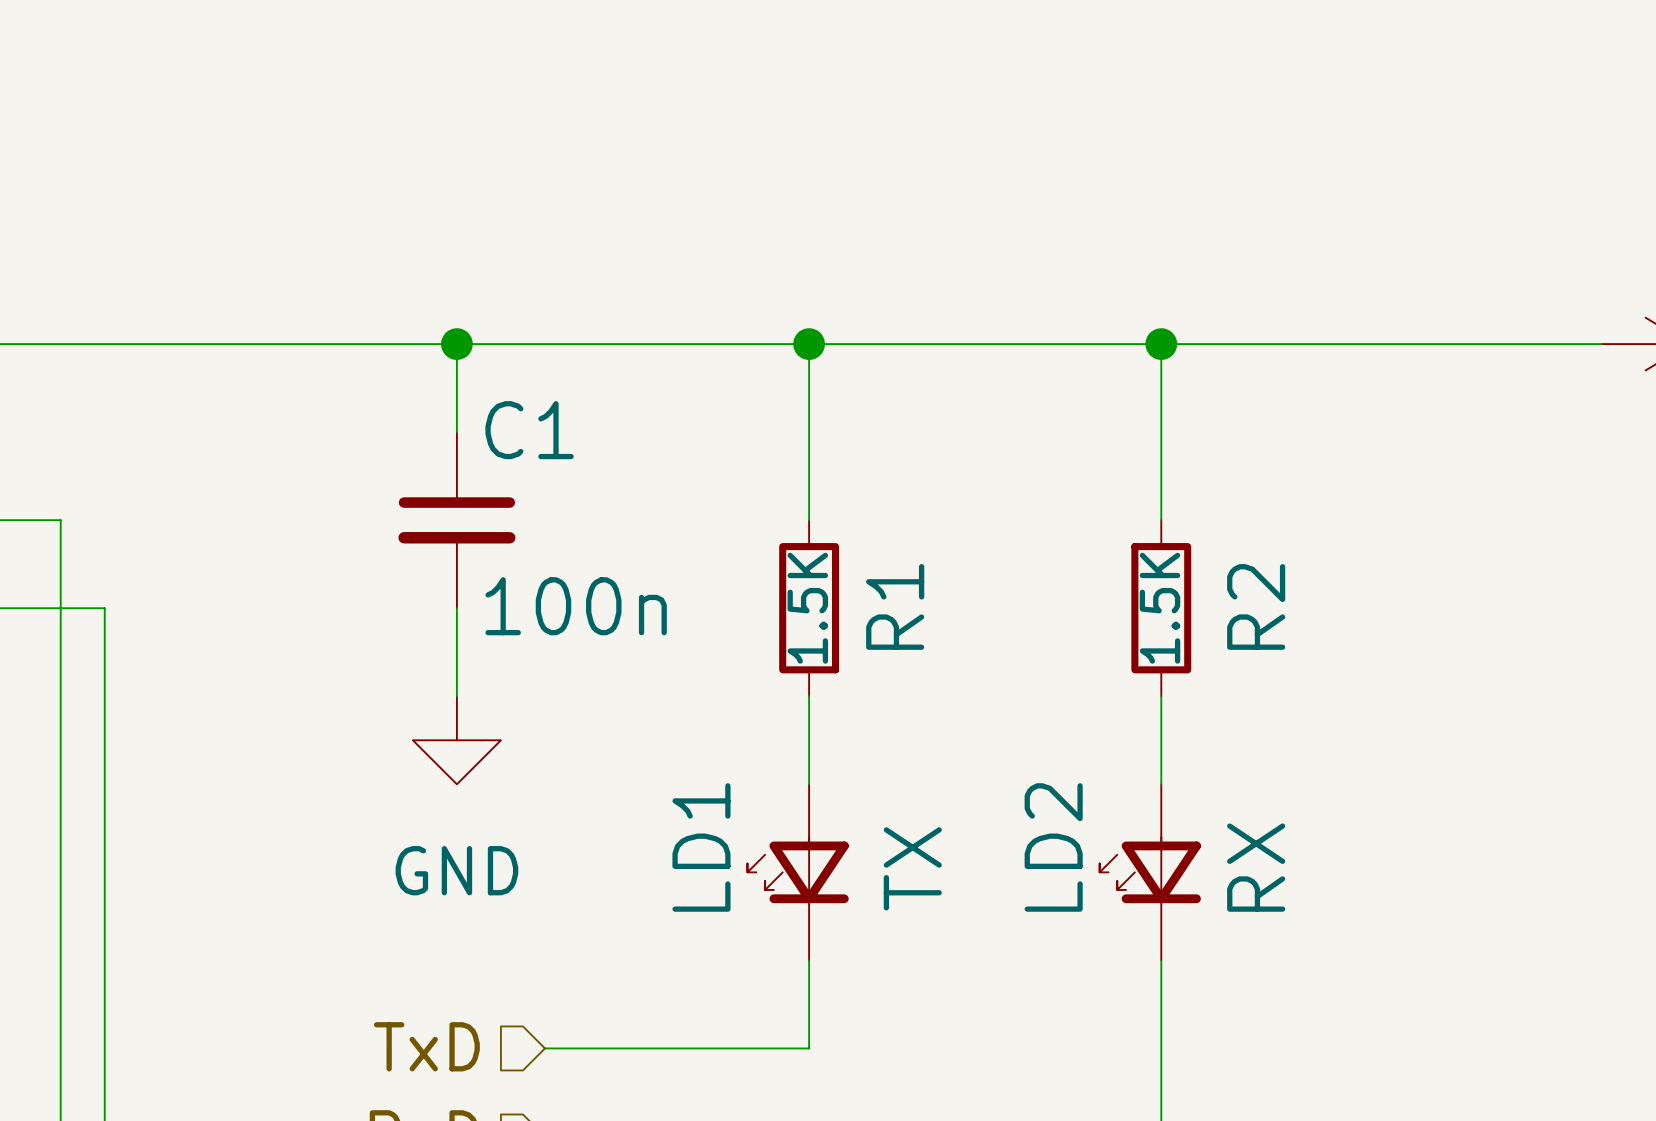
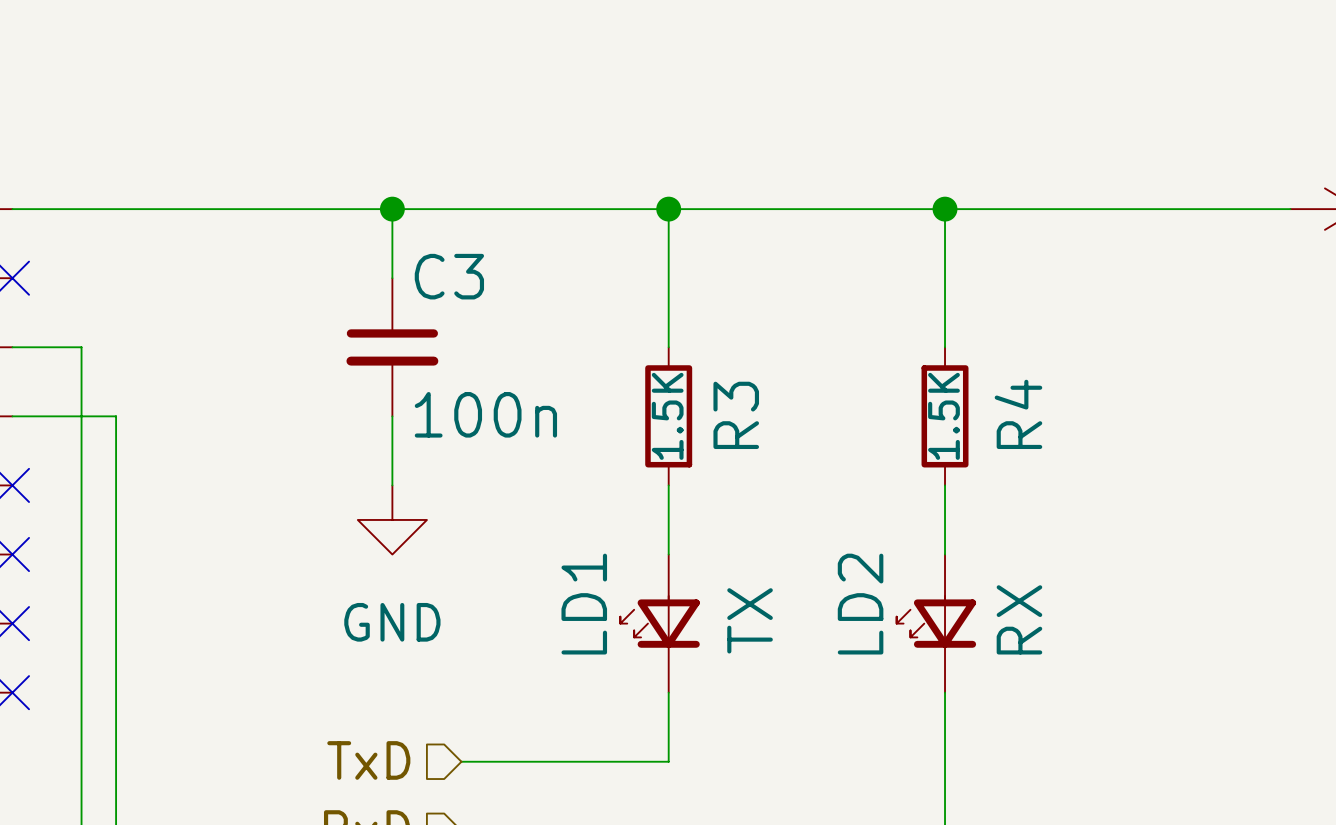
C1 name: C1 (529, 430) -> C3 (449, 276)
R1 name: R1 (895, 606) -> R3 (736, 415)
R2 name: R2 (1256, 606) -> R4 (1018, 414)

